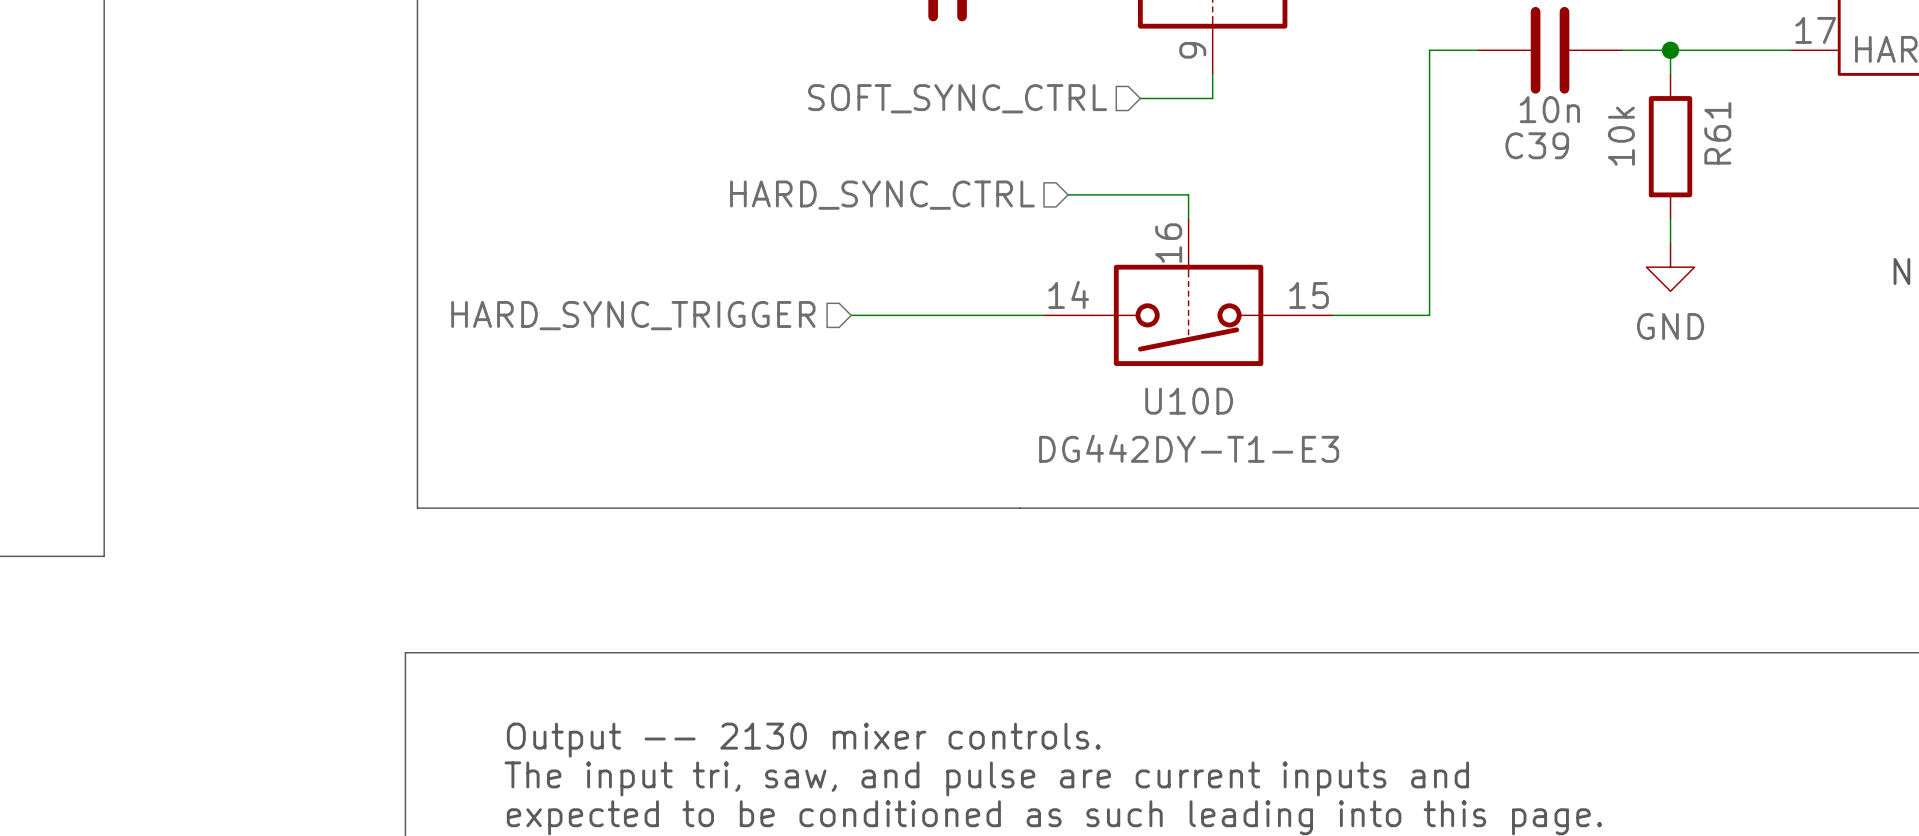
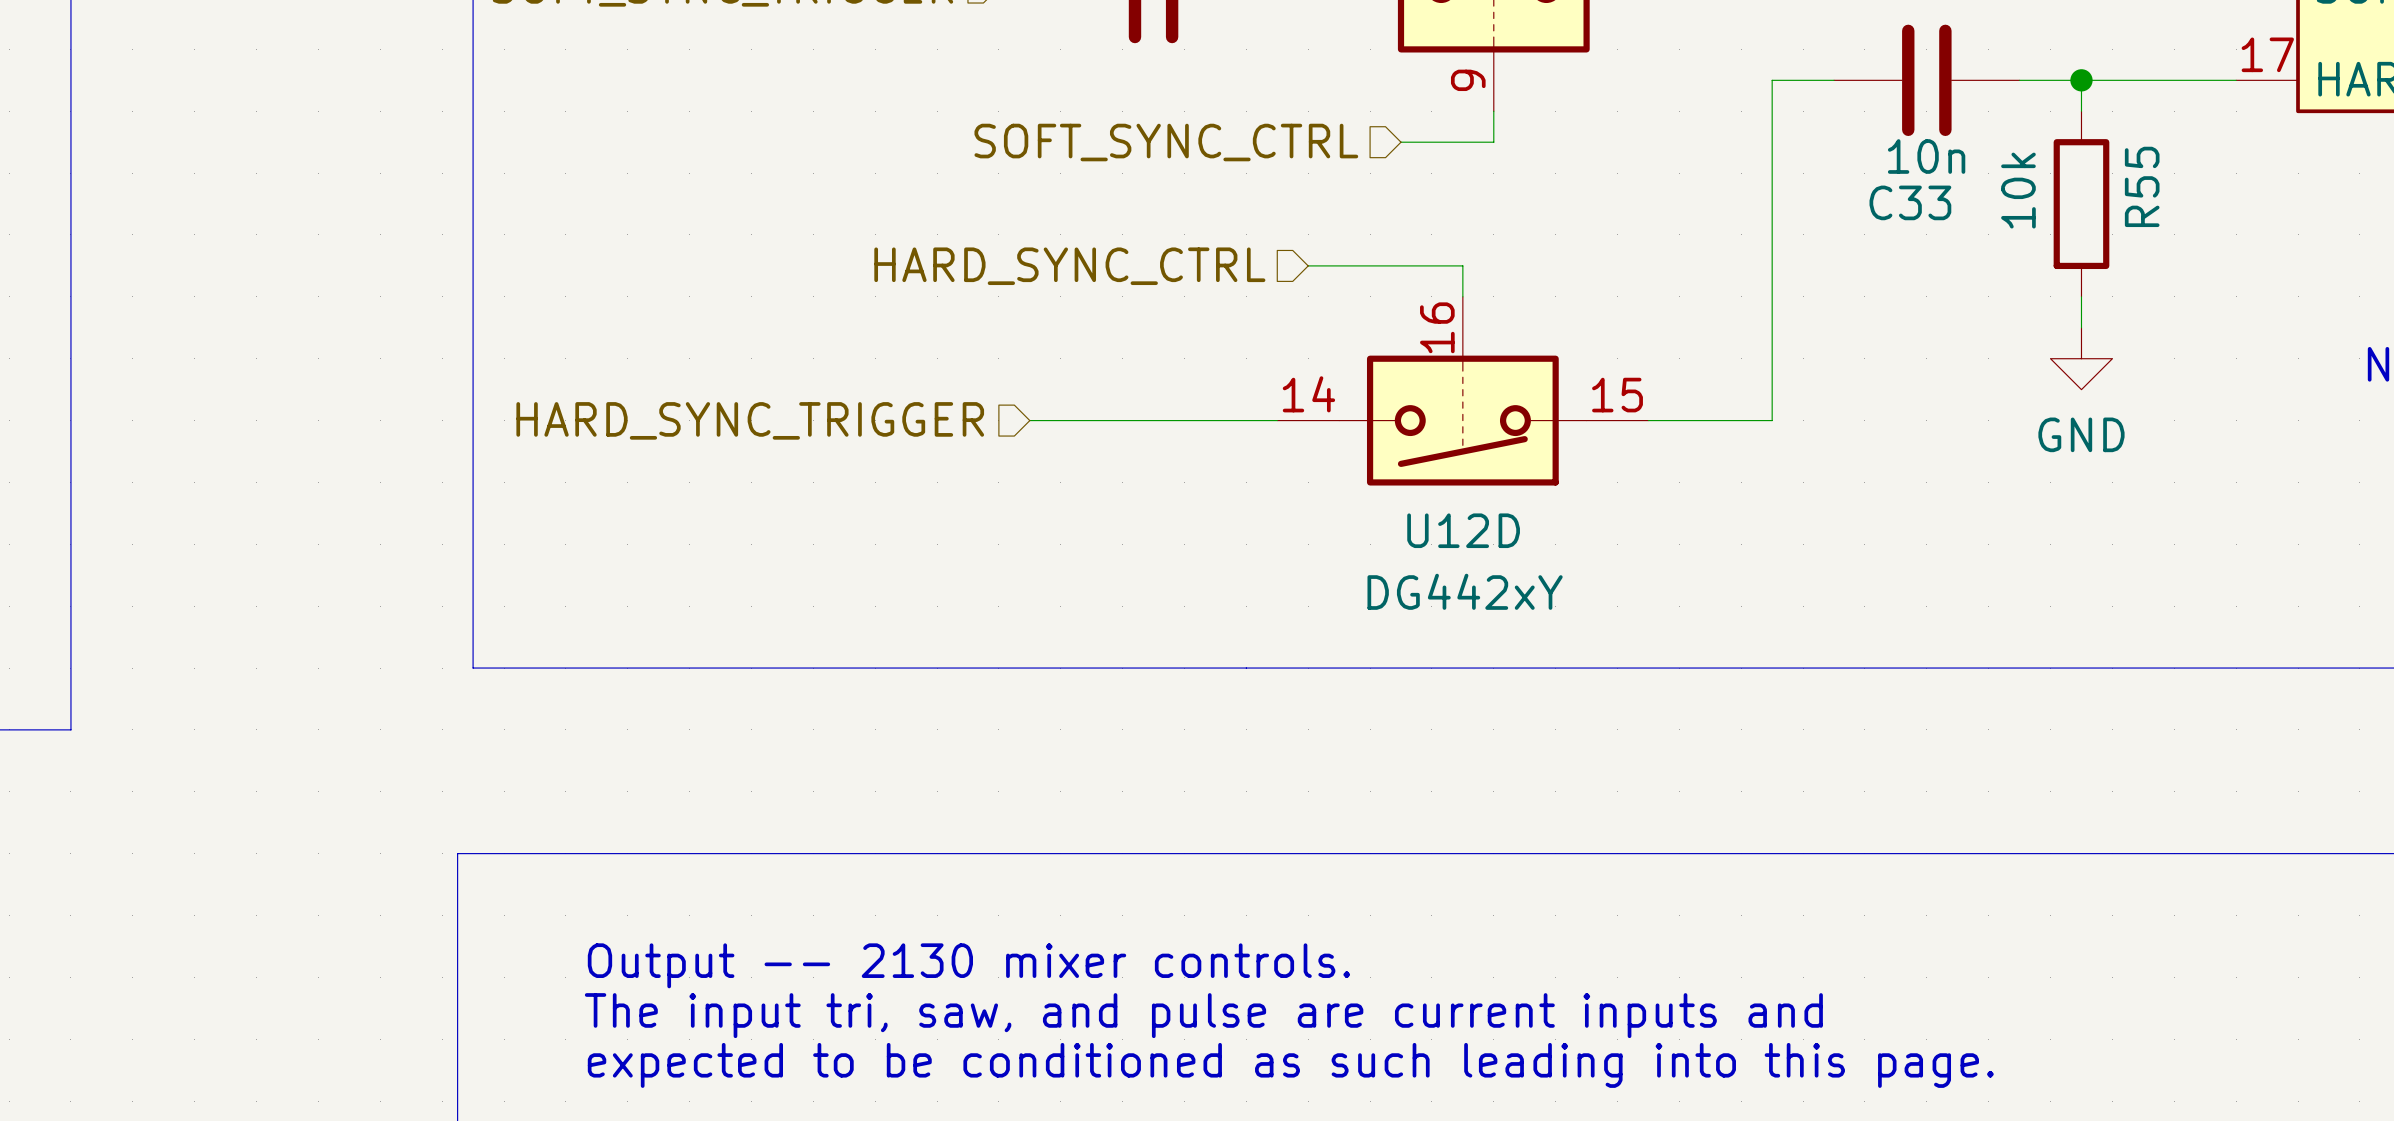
R61 name: R61 (1717, 133) -> R55 (2142, 186)
C39 name: C39 (1537, 145) -> C33 (1910, 202)
U10D name: U10D (1189, 401) -> U12D (1463, 530)
U10D value: DG442DY-T1-E3 (1189, 448) -> DG442xY (1465, 591)

